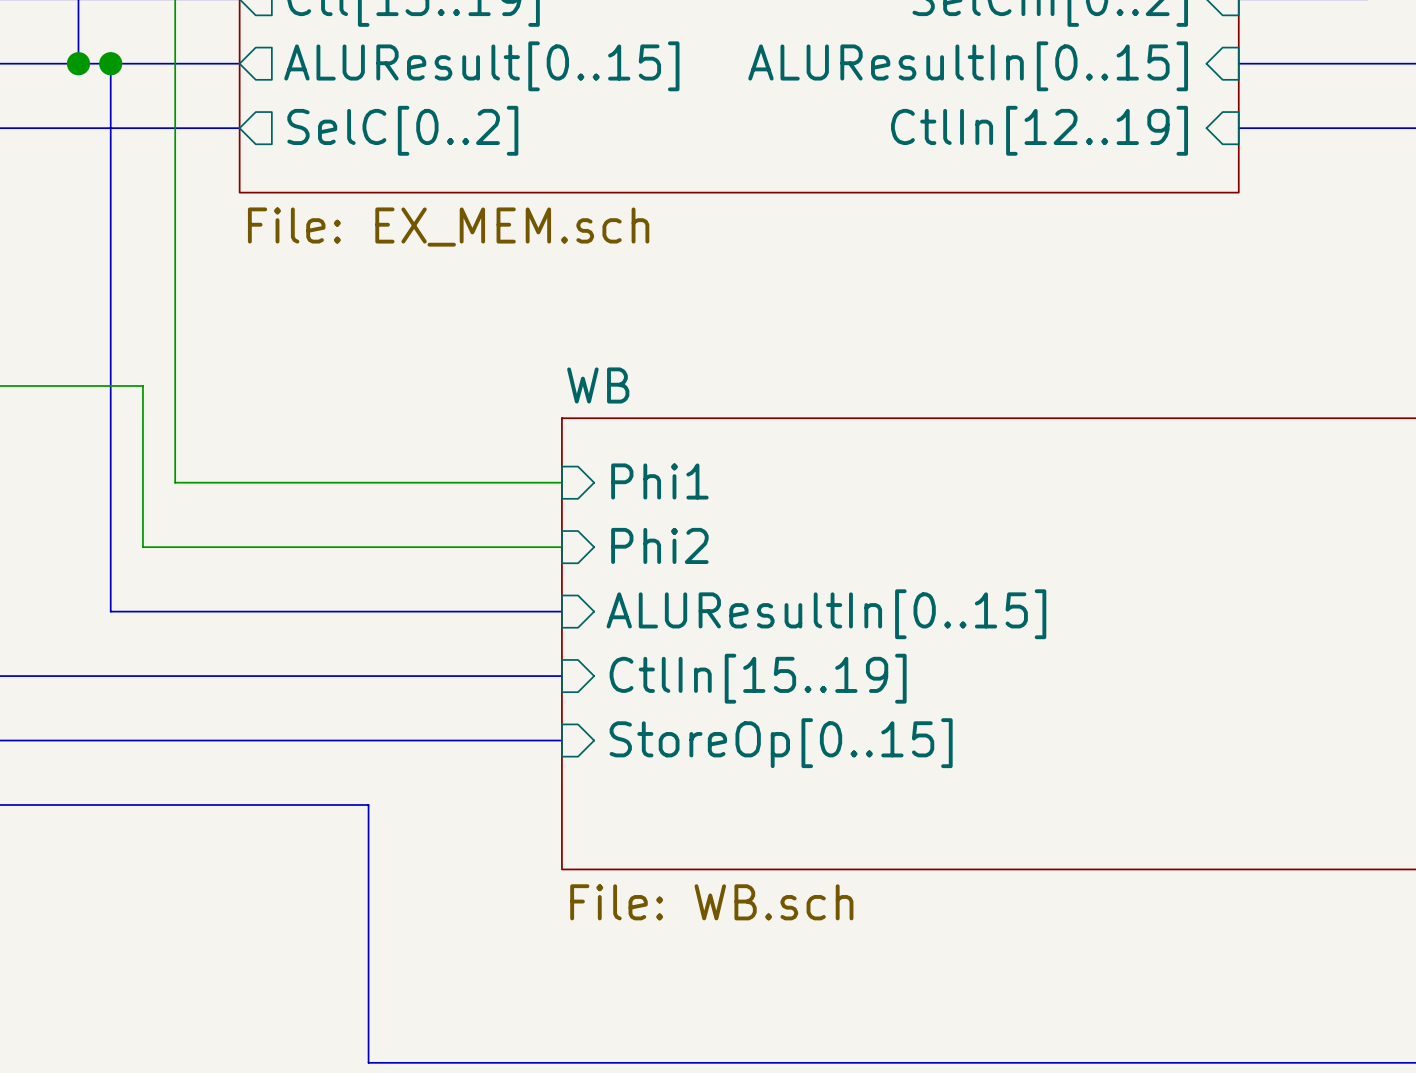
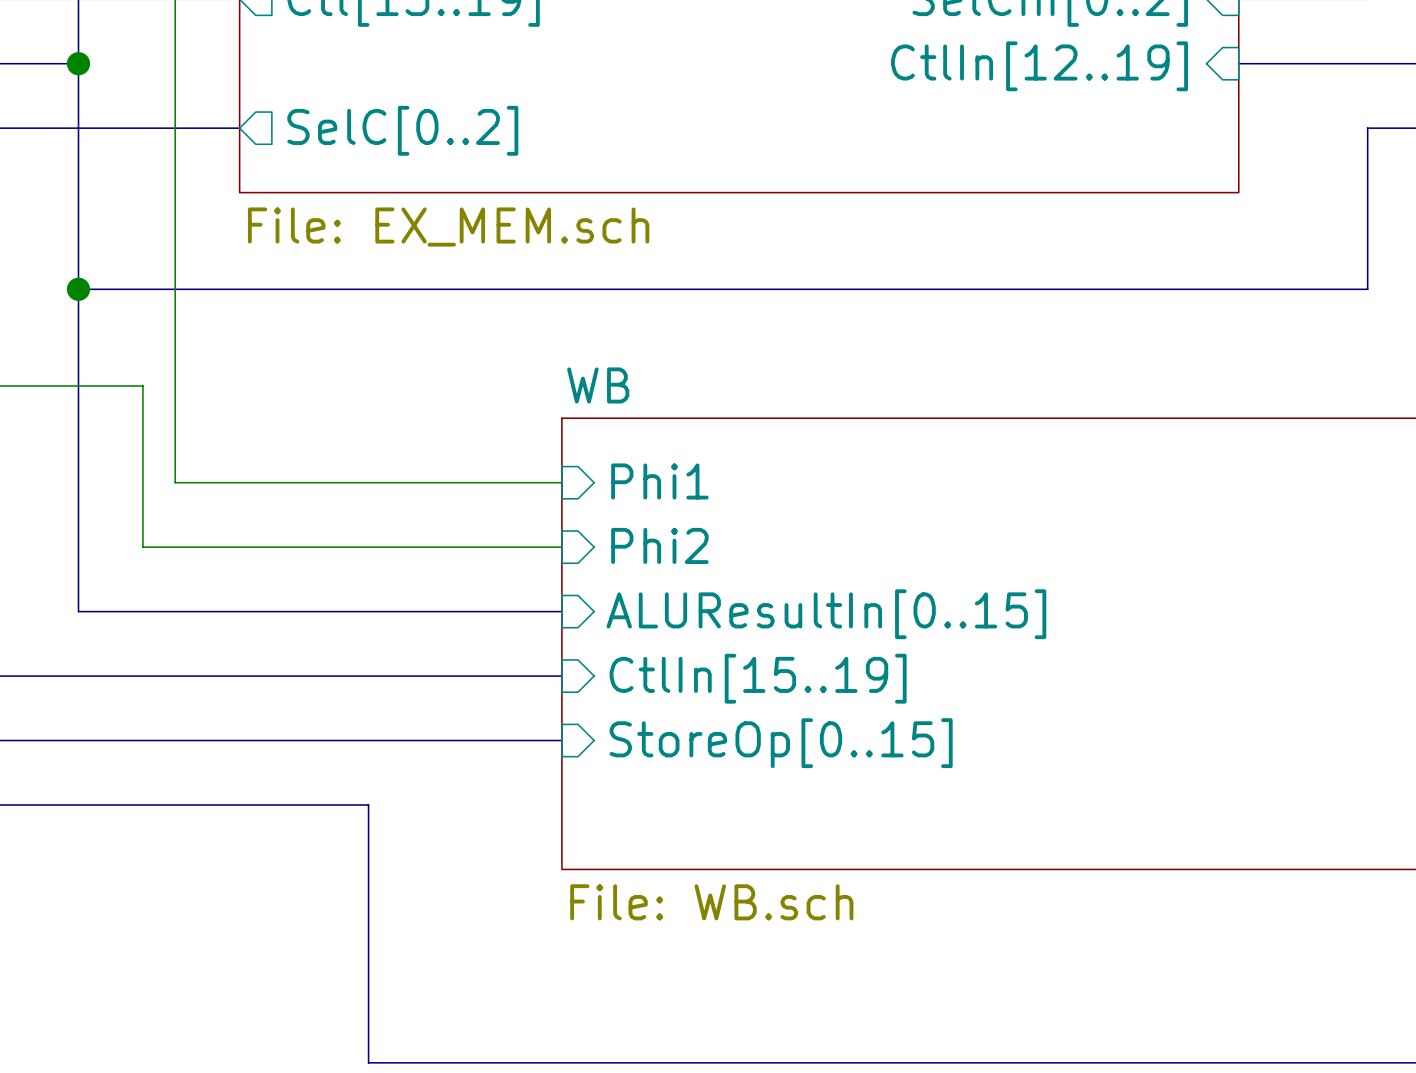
bus: (78, 63) (239, 63) -> none
bus: (110, 63) (110, 611) -> (78, 63) (78, 611) (110, 611)
junction: (110, 63) -> none
sheet pin: ALUResult[0..15] (481, 66) -> none
sheet pin: ALUResultIn[0..15] (968, 66) -> CtlIn[12..19] (1039, 66)
bus: (1238, 128) (1367, 128) -> (78, 289) (1367, 289) (1367, 128)
sheet pin: CtlIn[12..19] (1039, 130) -> none
junction: none -> (78, 289)

